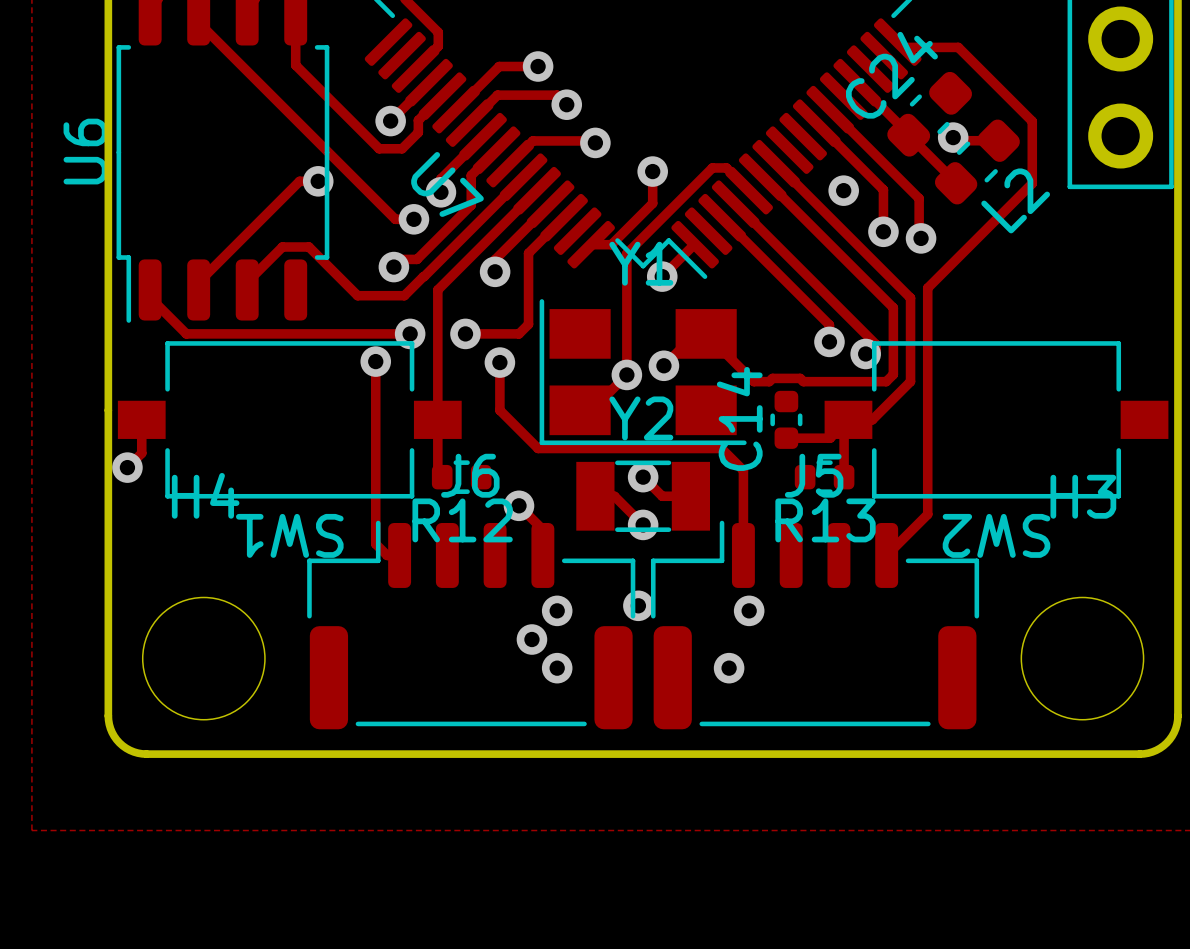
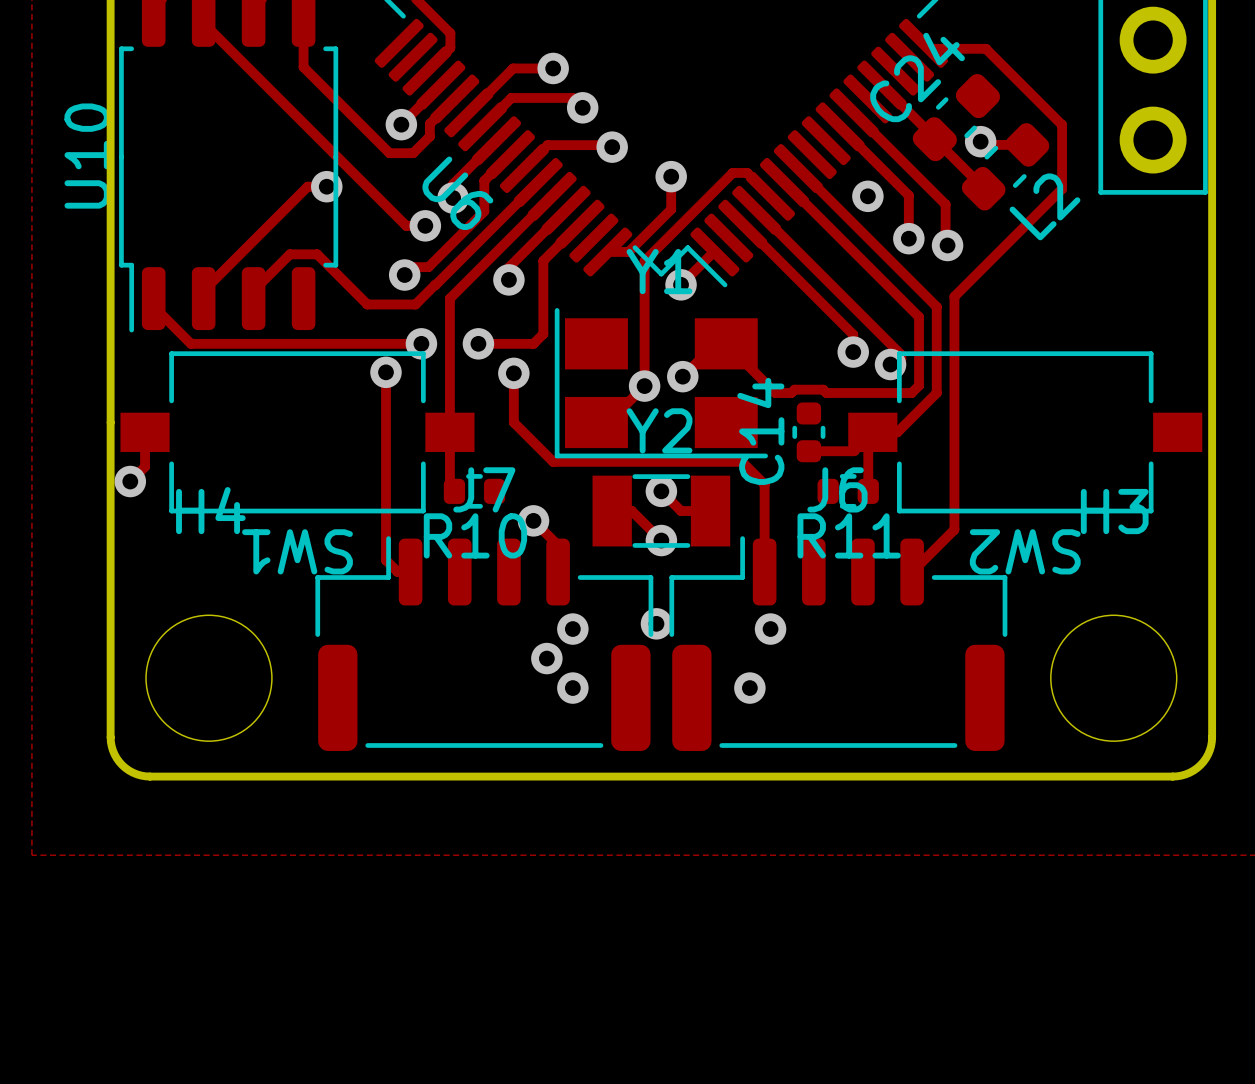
U6 name: U6 (85, 151) -> U10 (87, 156)
U7 name: U7 (447, 184) -> U6 (457, 193)
J6 name: J6 (470, 475) -> J7 (484, 489)
J5 name: J5 (814, 475) -> J6 (837, 489)
R12 name: R12 (462, 520) -> R10 (475, 535)
R13 name: R13 (825, 520) -> R11 (849, 535)

